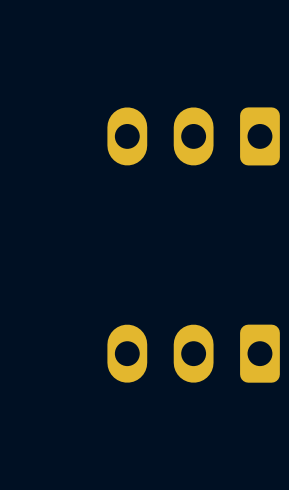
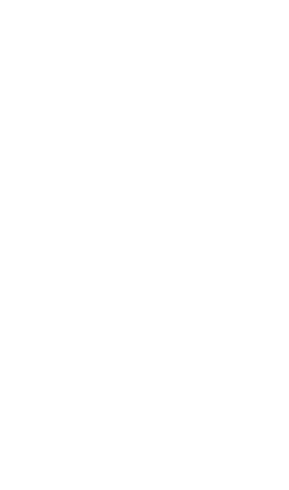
part: (193, 136) -> none
part: (193, 353) -> none

